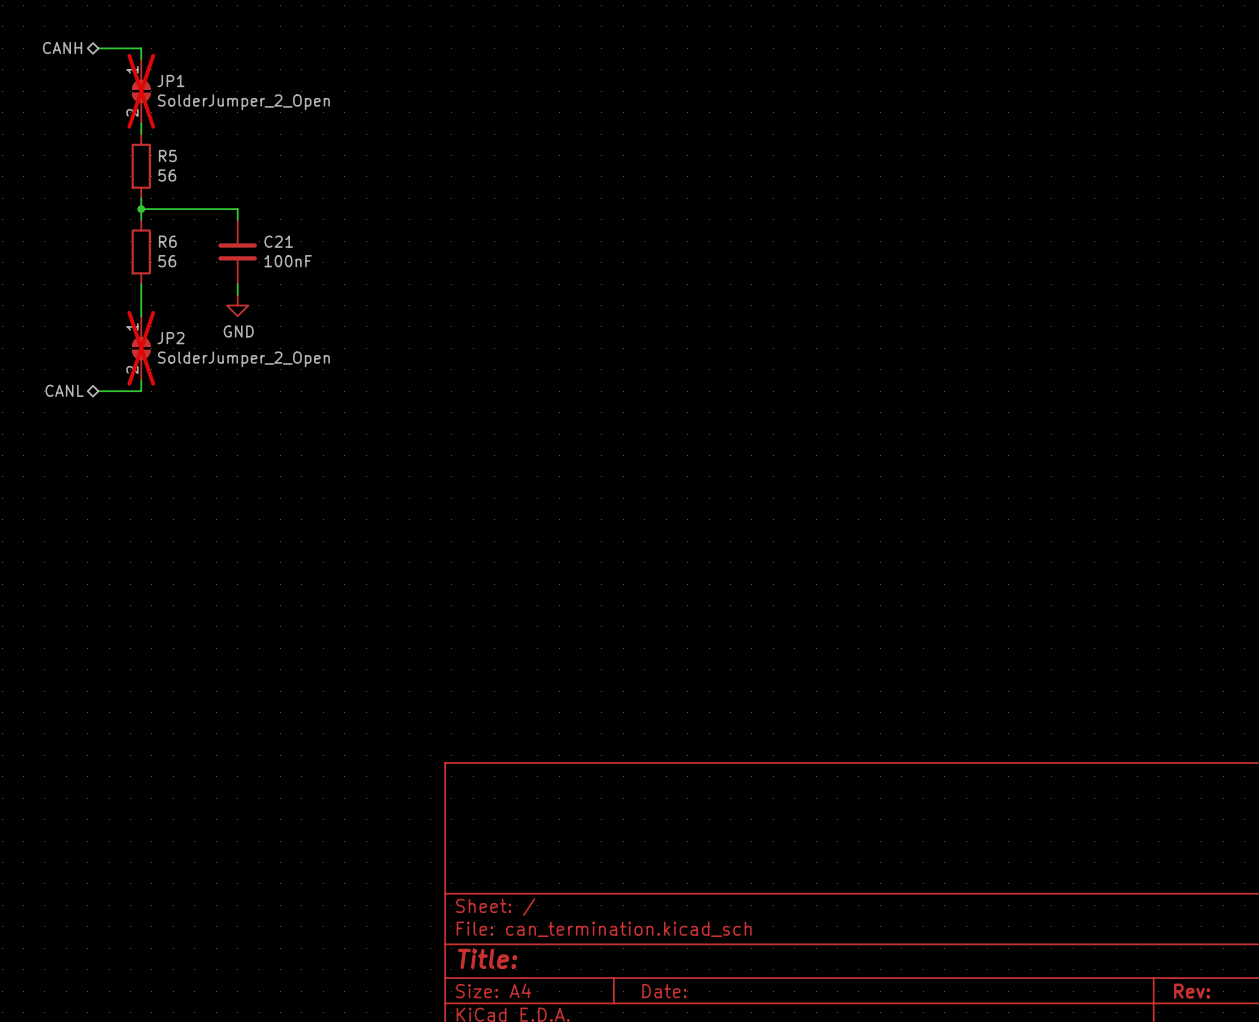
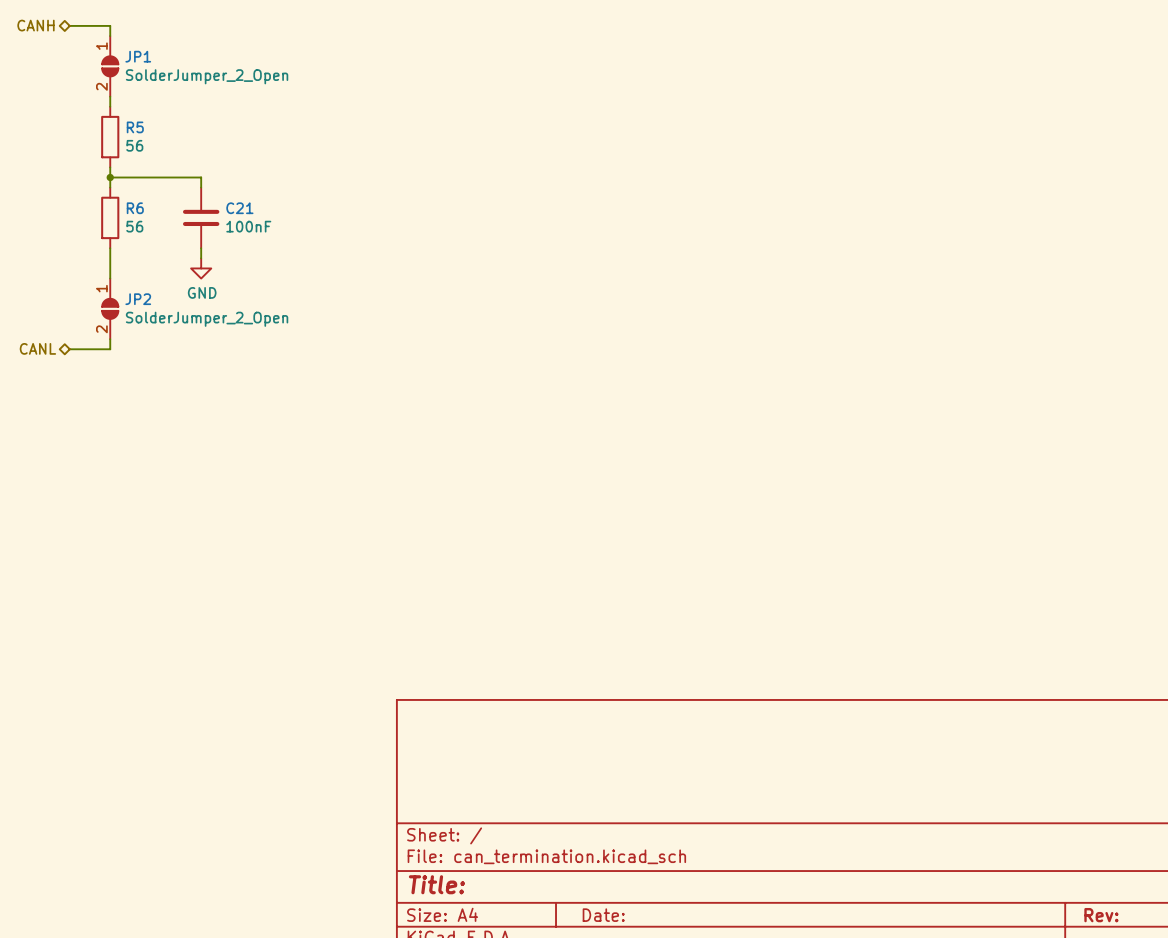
JP1 do-not-place cross: (141, 91) -> none
JP2 do-not-place cross: (141, 348) -> none

